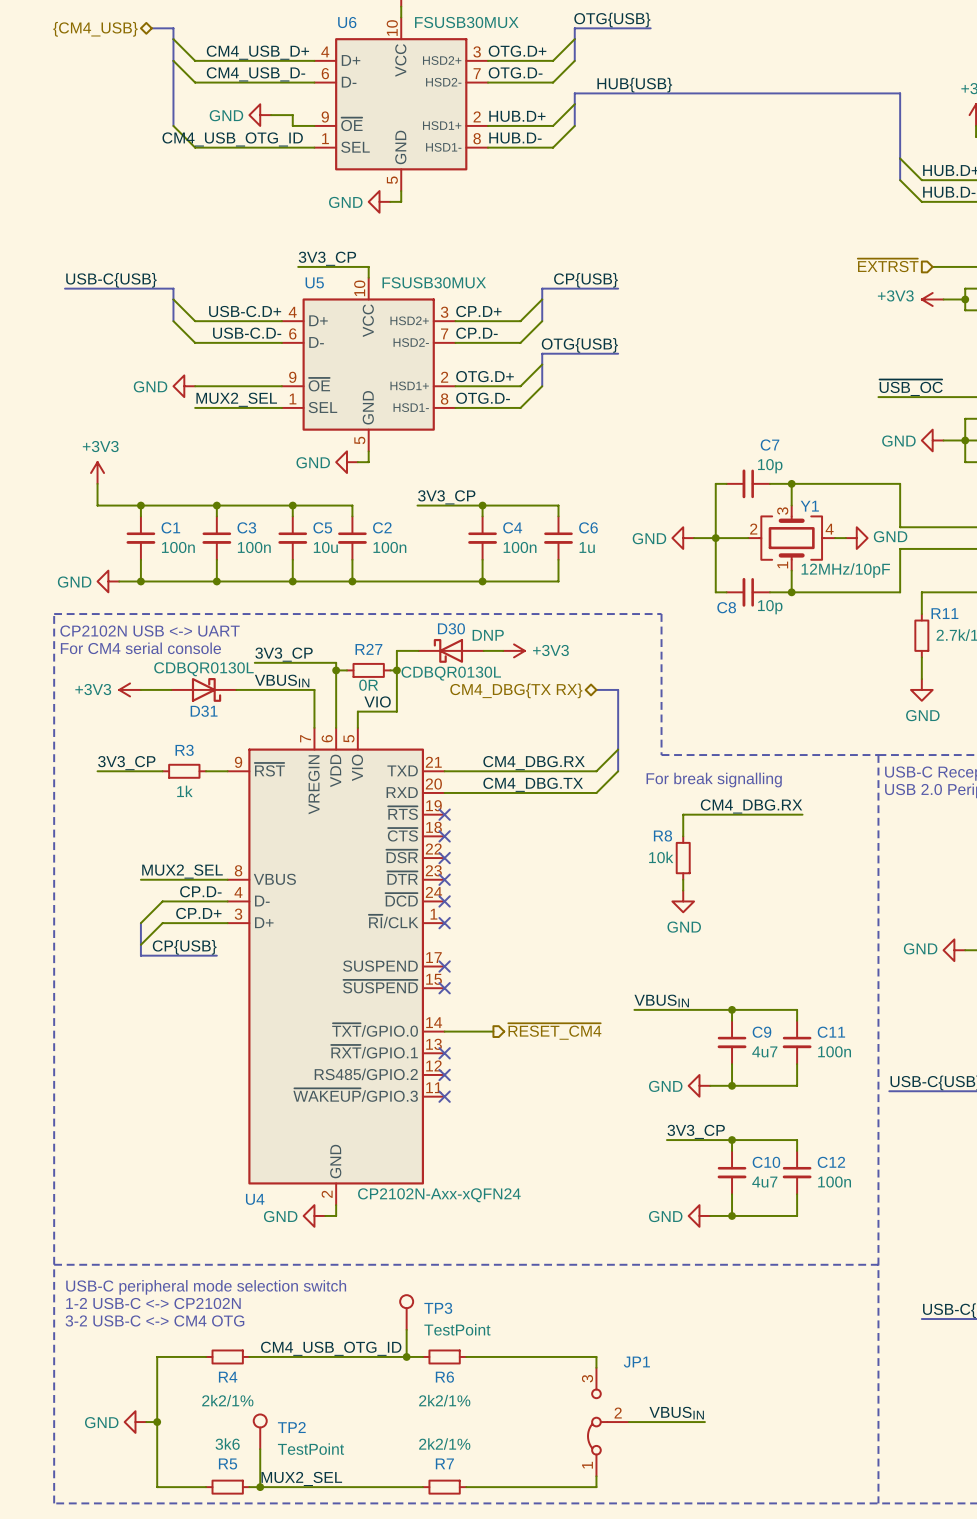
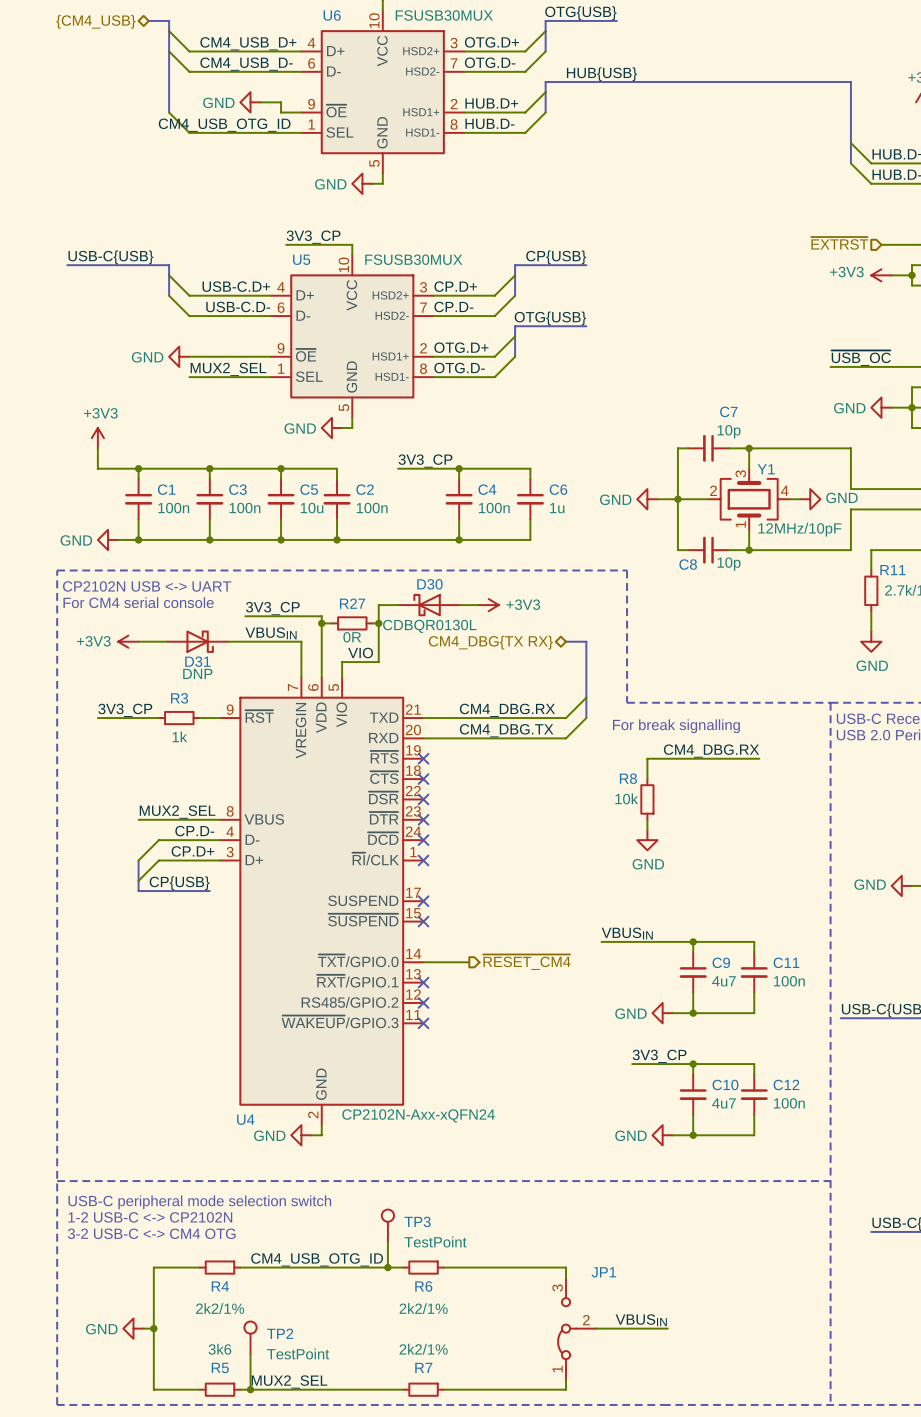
D30 text: DNP (488, 635) -> none
D31 value: CDBQR0130L (203, 669) -> none
D31 text: none -> DNP (197, 673)

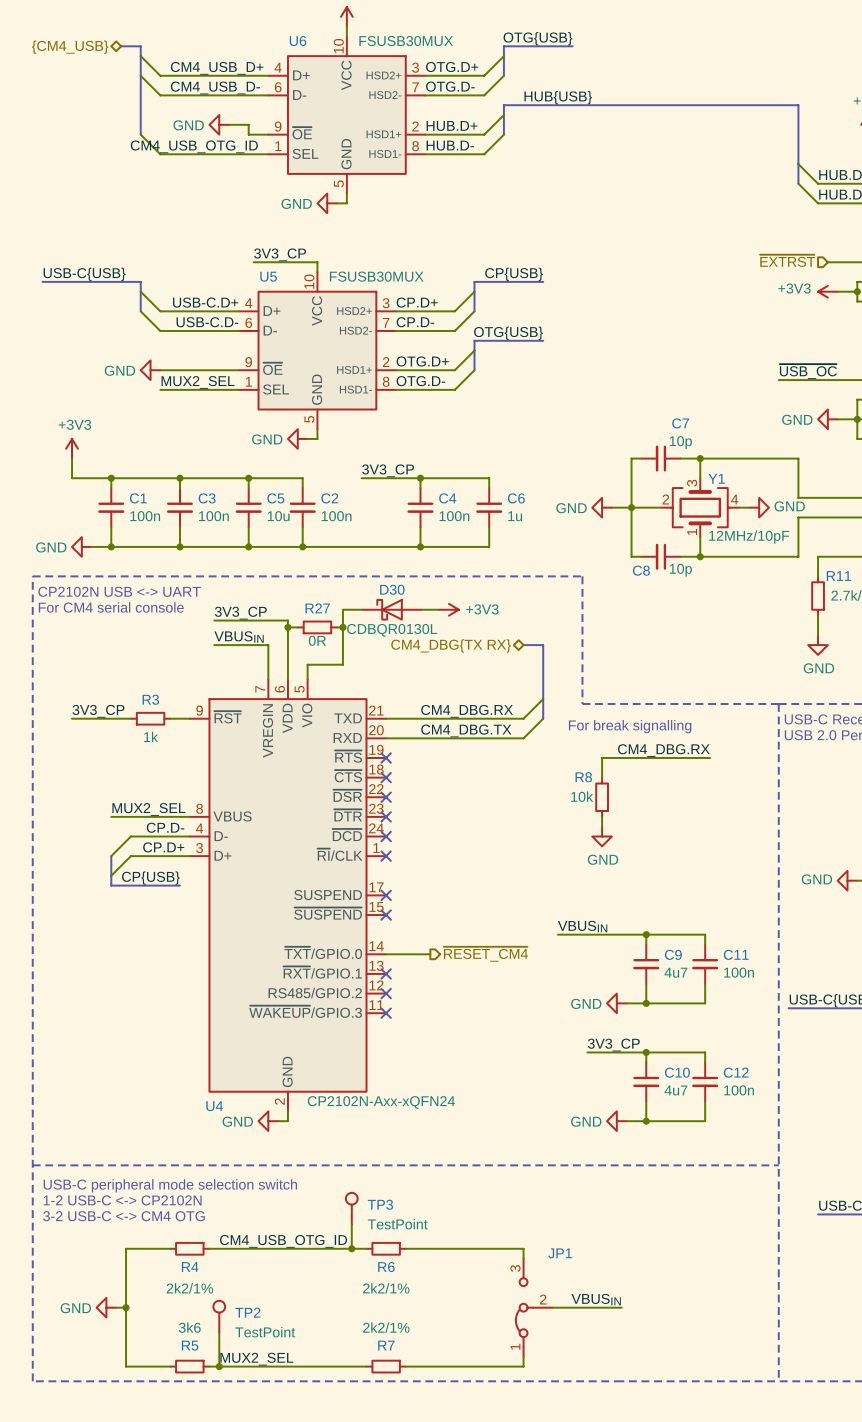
power symbol: +3V3 (128, 641) -> none
wire: (138, 641) (167, 641) -> none
D31: (197, 641) -> none
wire: (228, 641) (245, 641) -> none
label: VIO (360, 652) -> none

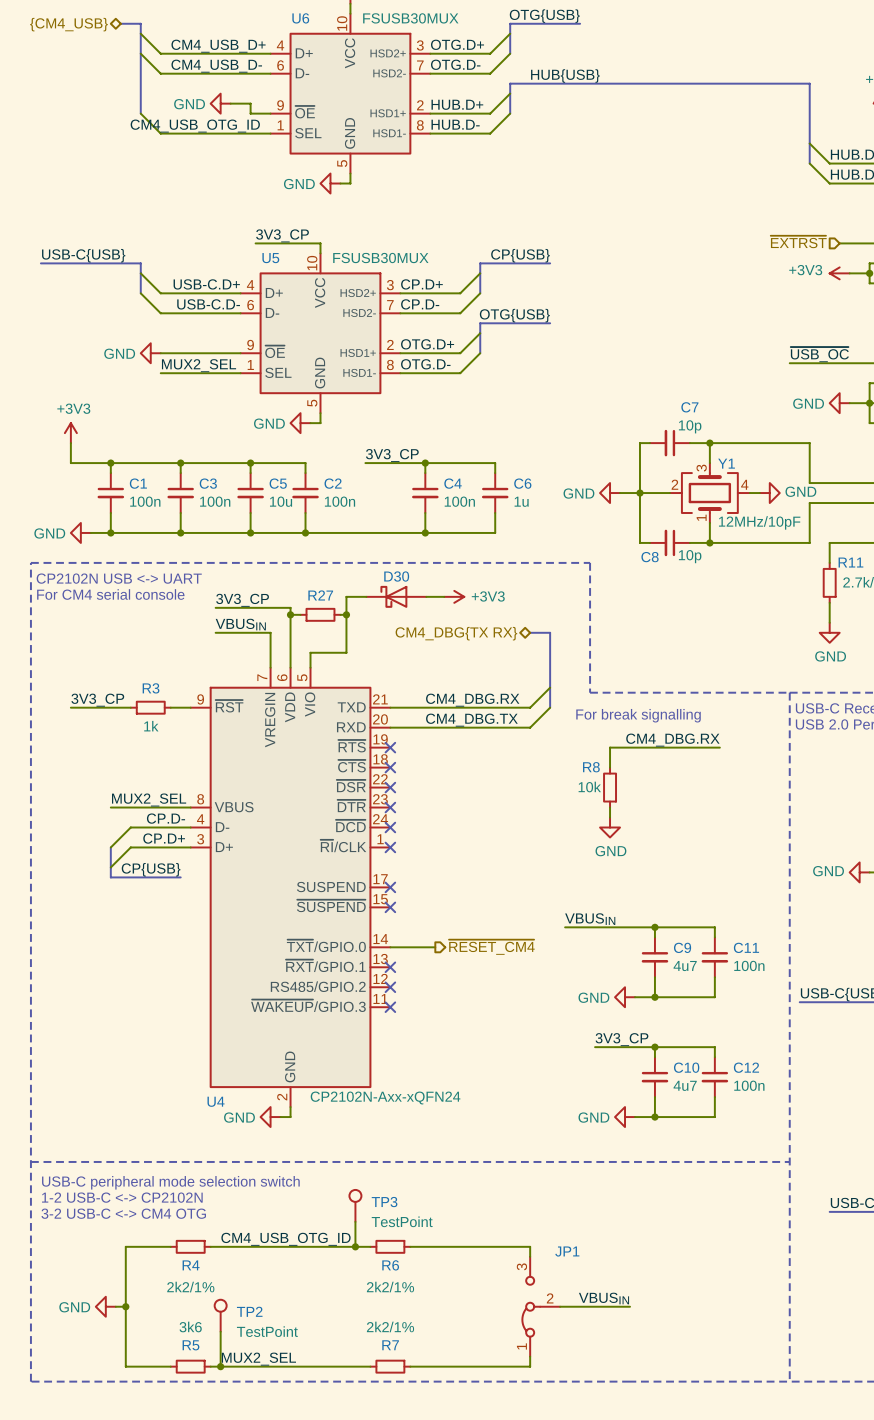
D30 value: CDBQR0130L (392, 630) -> none
R27 value: 0R (317, 640) -> none

